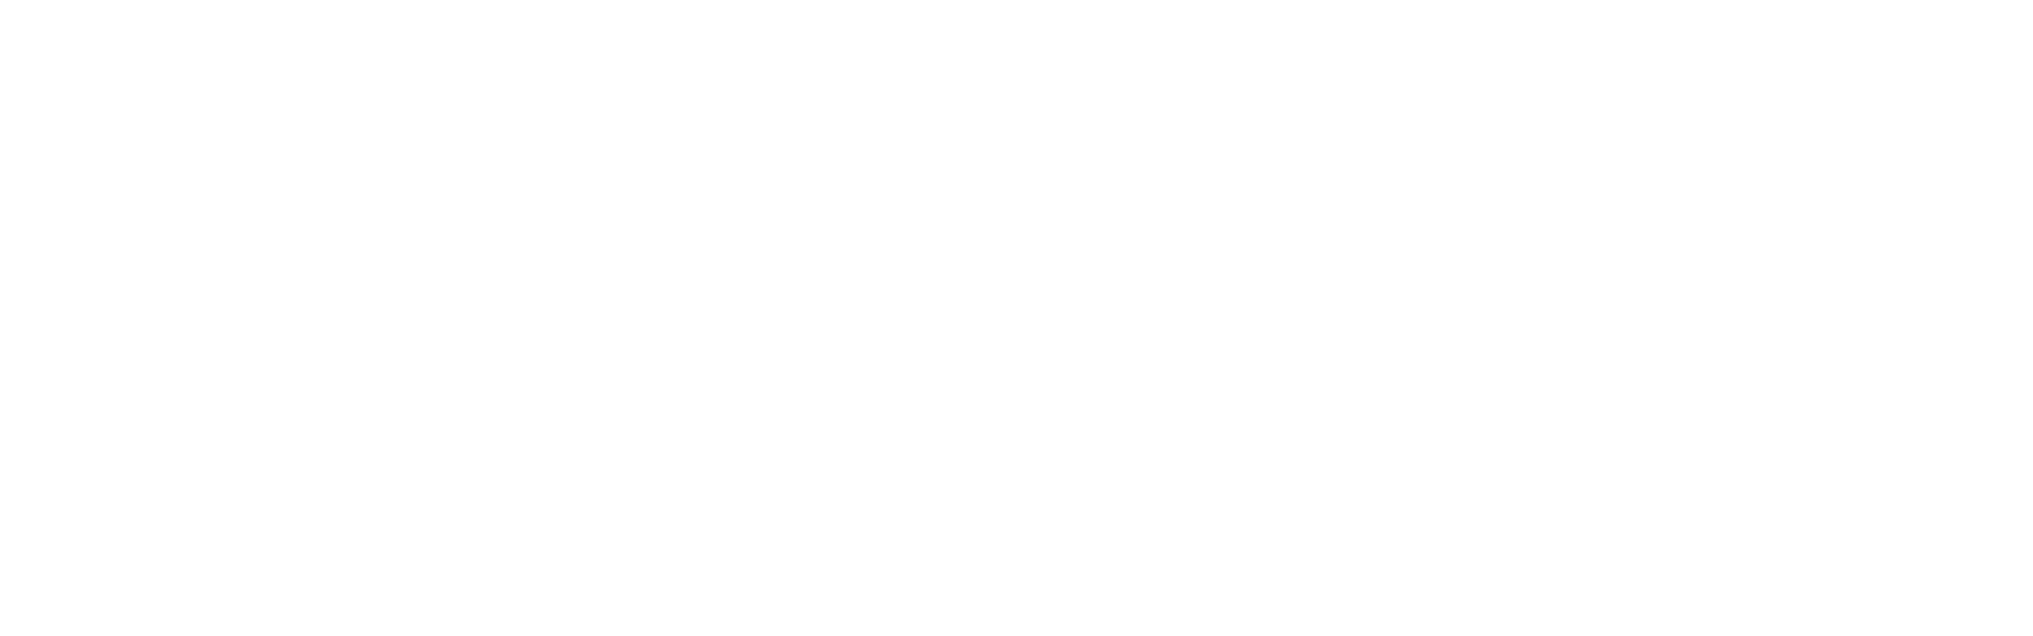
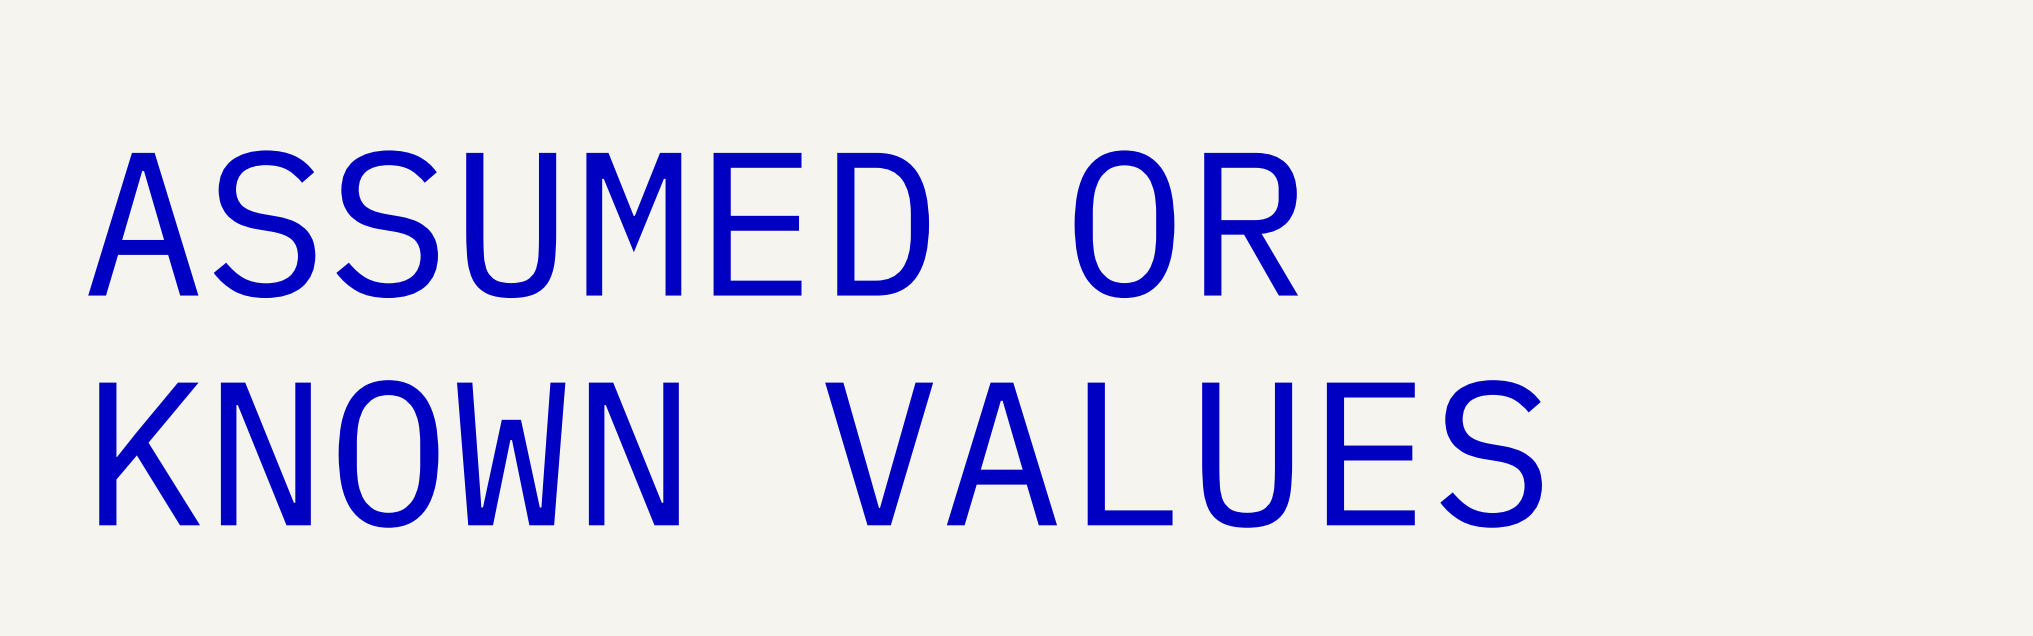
text: none -> ASSUMED OR (693, 224)
text: none -> KNOWN VALUES (820, 453)

